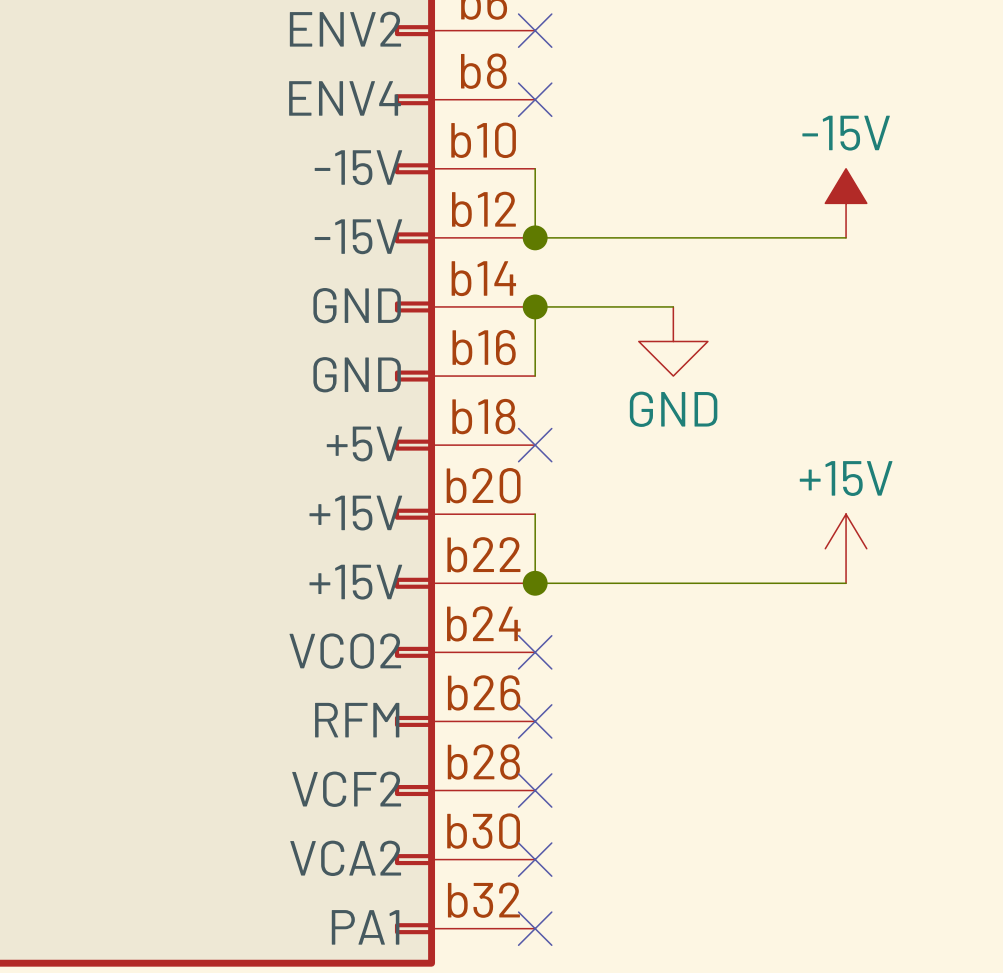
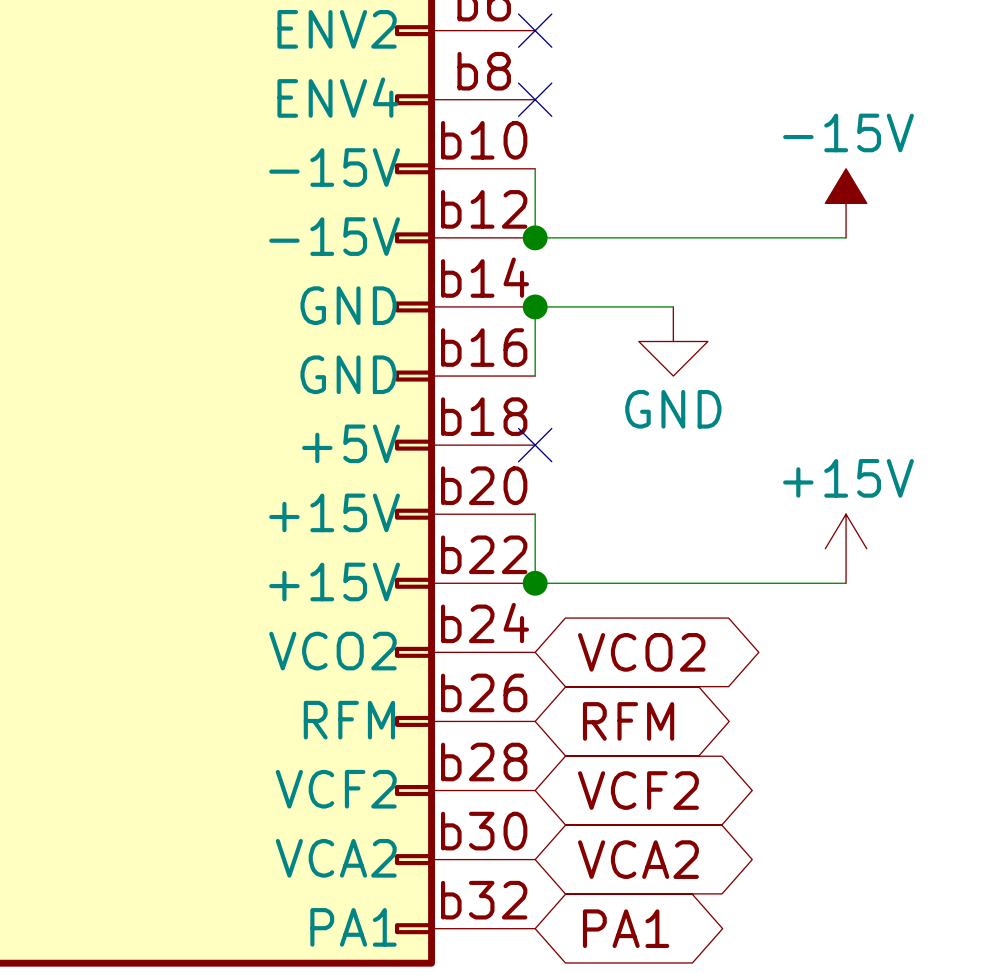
no-connect mark: (535, 652) -> none
global label: none -> VCO2 (641, 652)
no-connect mark: (535, 721) -> none
global label: none -> RFM (628, 721)
no-connect mark: (535, 790) -> none
global label: none -> VCF2 (638, 790)
no-connect mark: (535, 859) -> none
global label: none -> VCA2 (638, 859)
no-connect mark: (535, 928) -> none
global label: none -> PA1 (626, 928)

